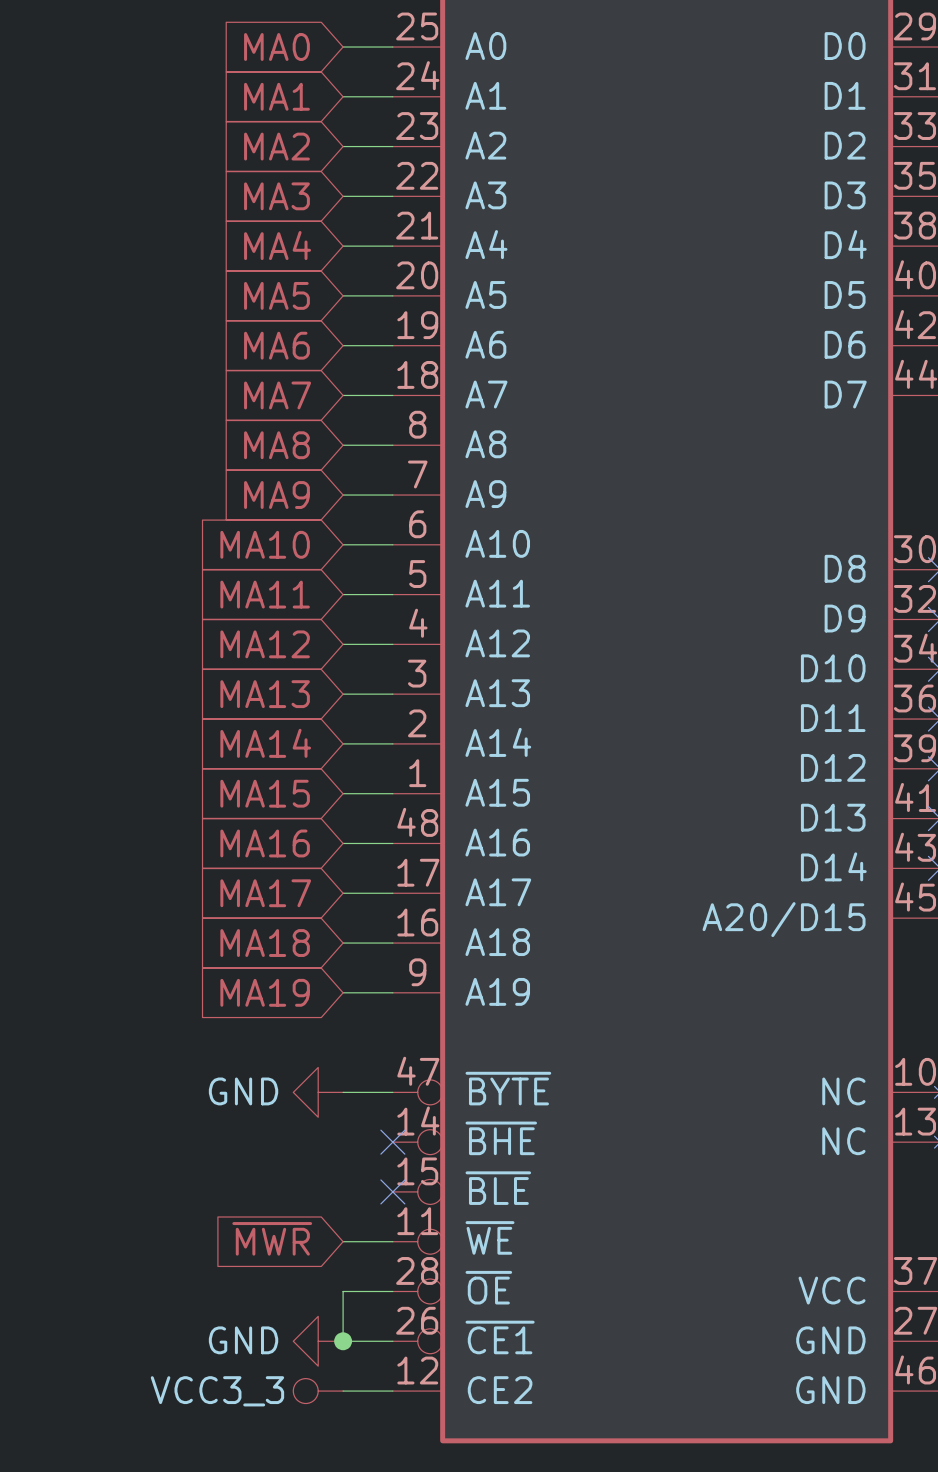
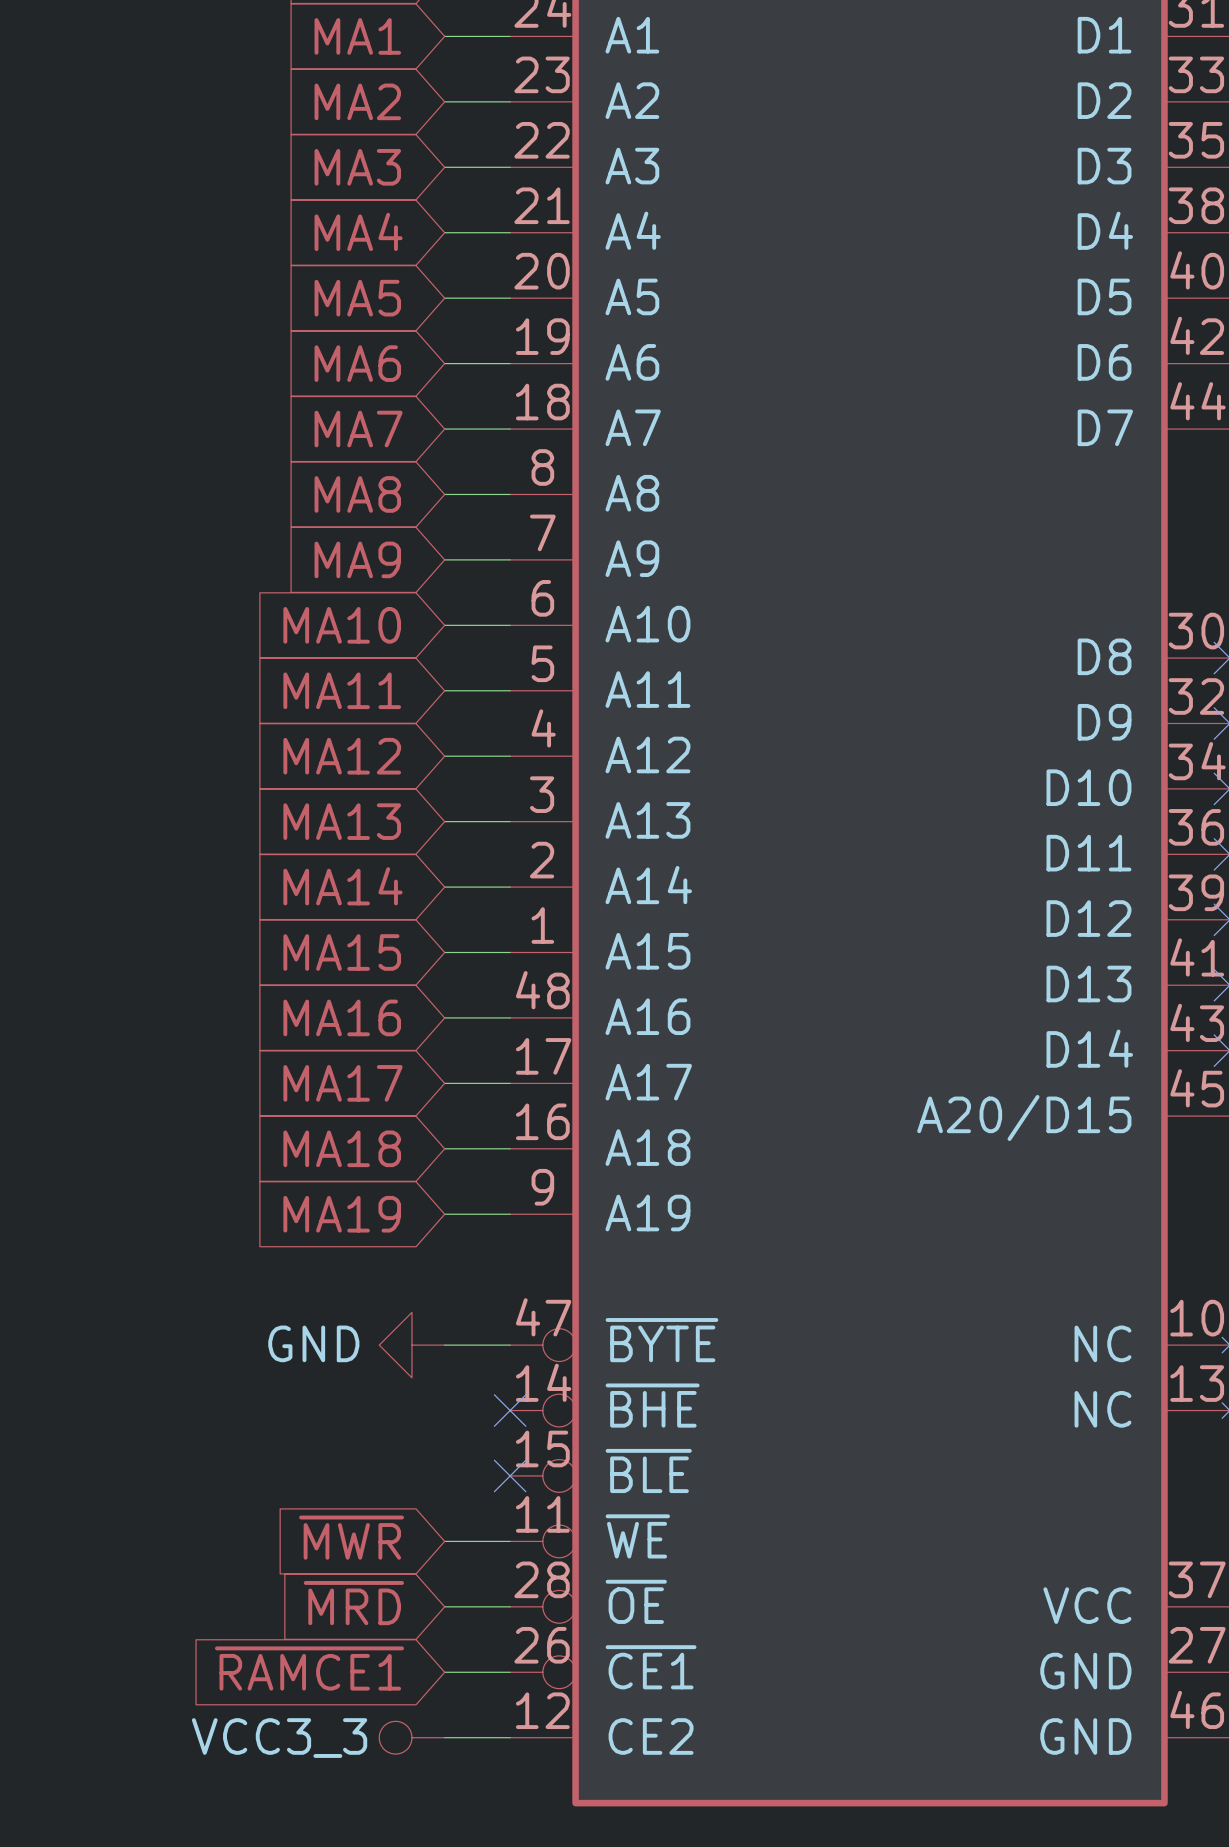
global label: none -> ~{MRD} (353, 1603)
wire: (343, 1291) (343, 1341) -> none
global label: none -> ~{RAMCE1} (309, 1668)
power symbol: GND (318, 1341) -> none
junction: (343, 1341) -> none

